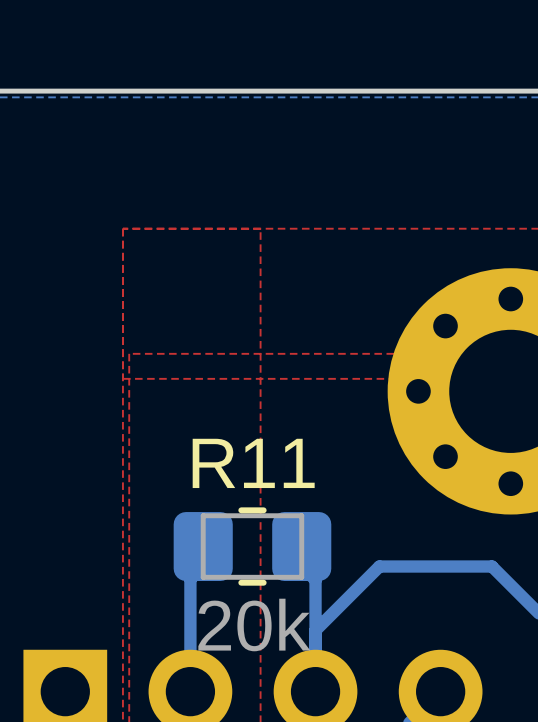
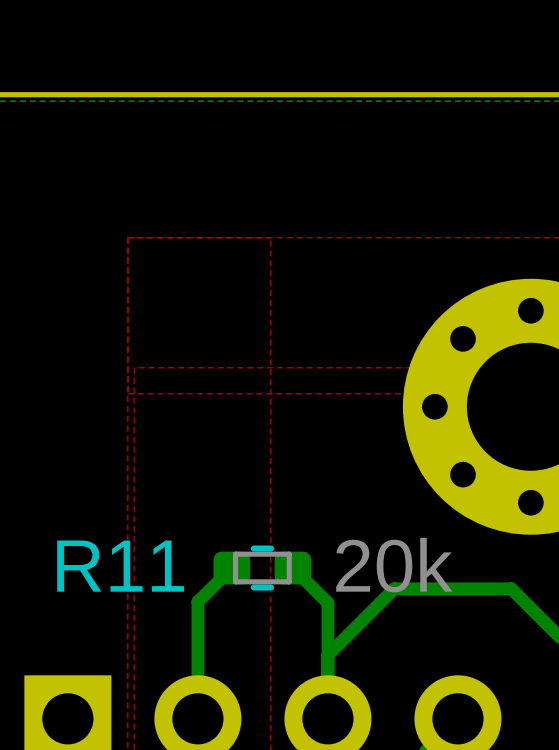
R11 name position: R11 (253, 463) -> R11 (120, 566)
R11 footprint: [173, 507, 332, 586] -> [213, 545, 312, 591]
R11 value position: 20k (254, 624) -> 20k (394, 565)

